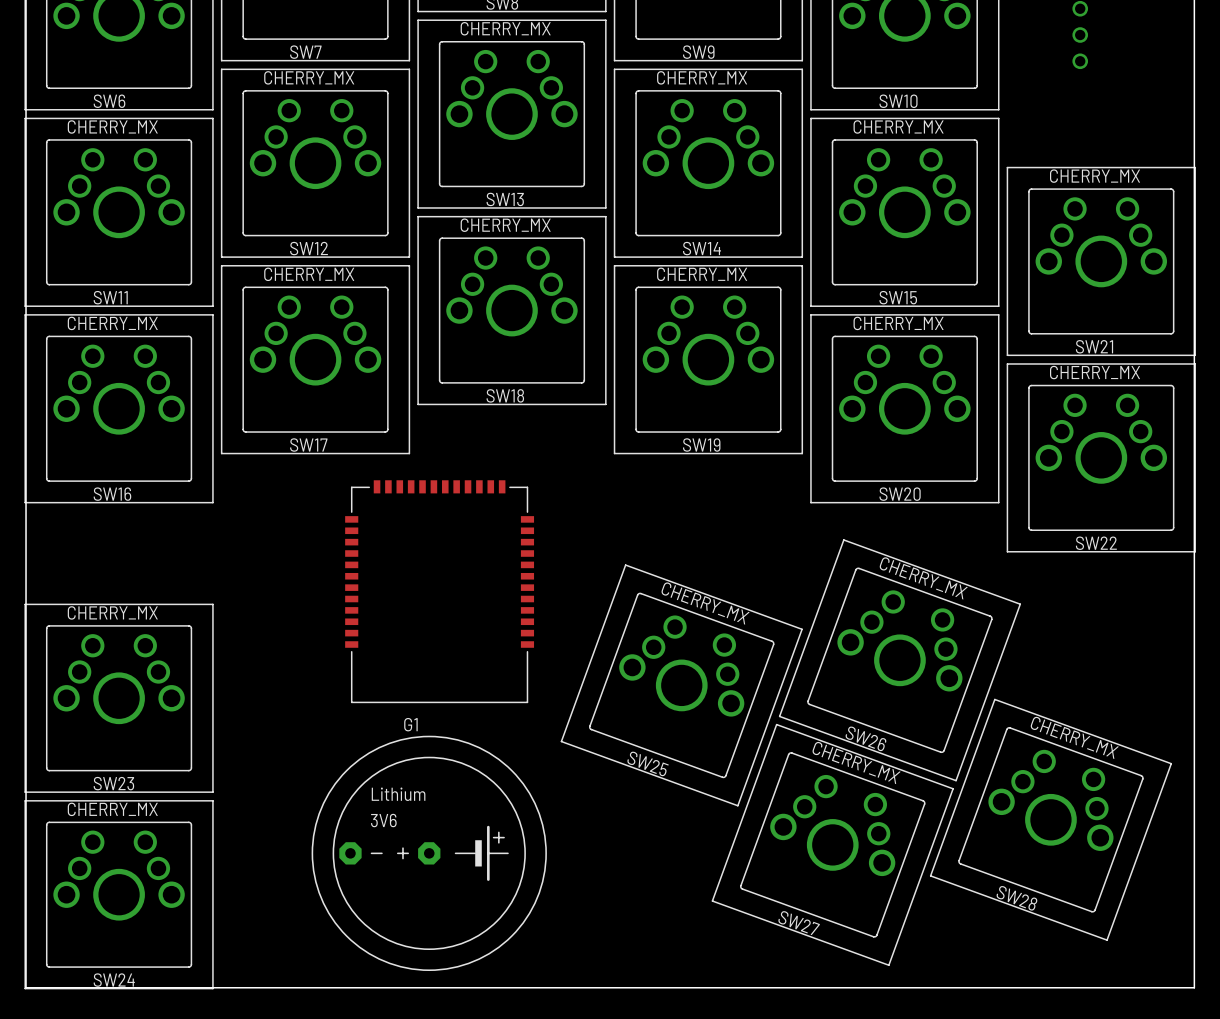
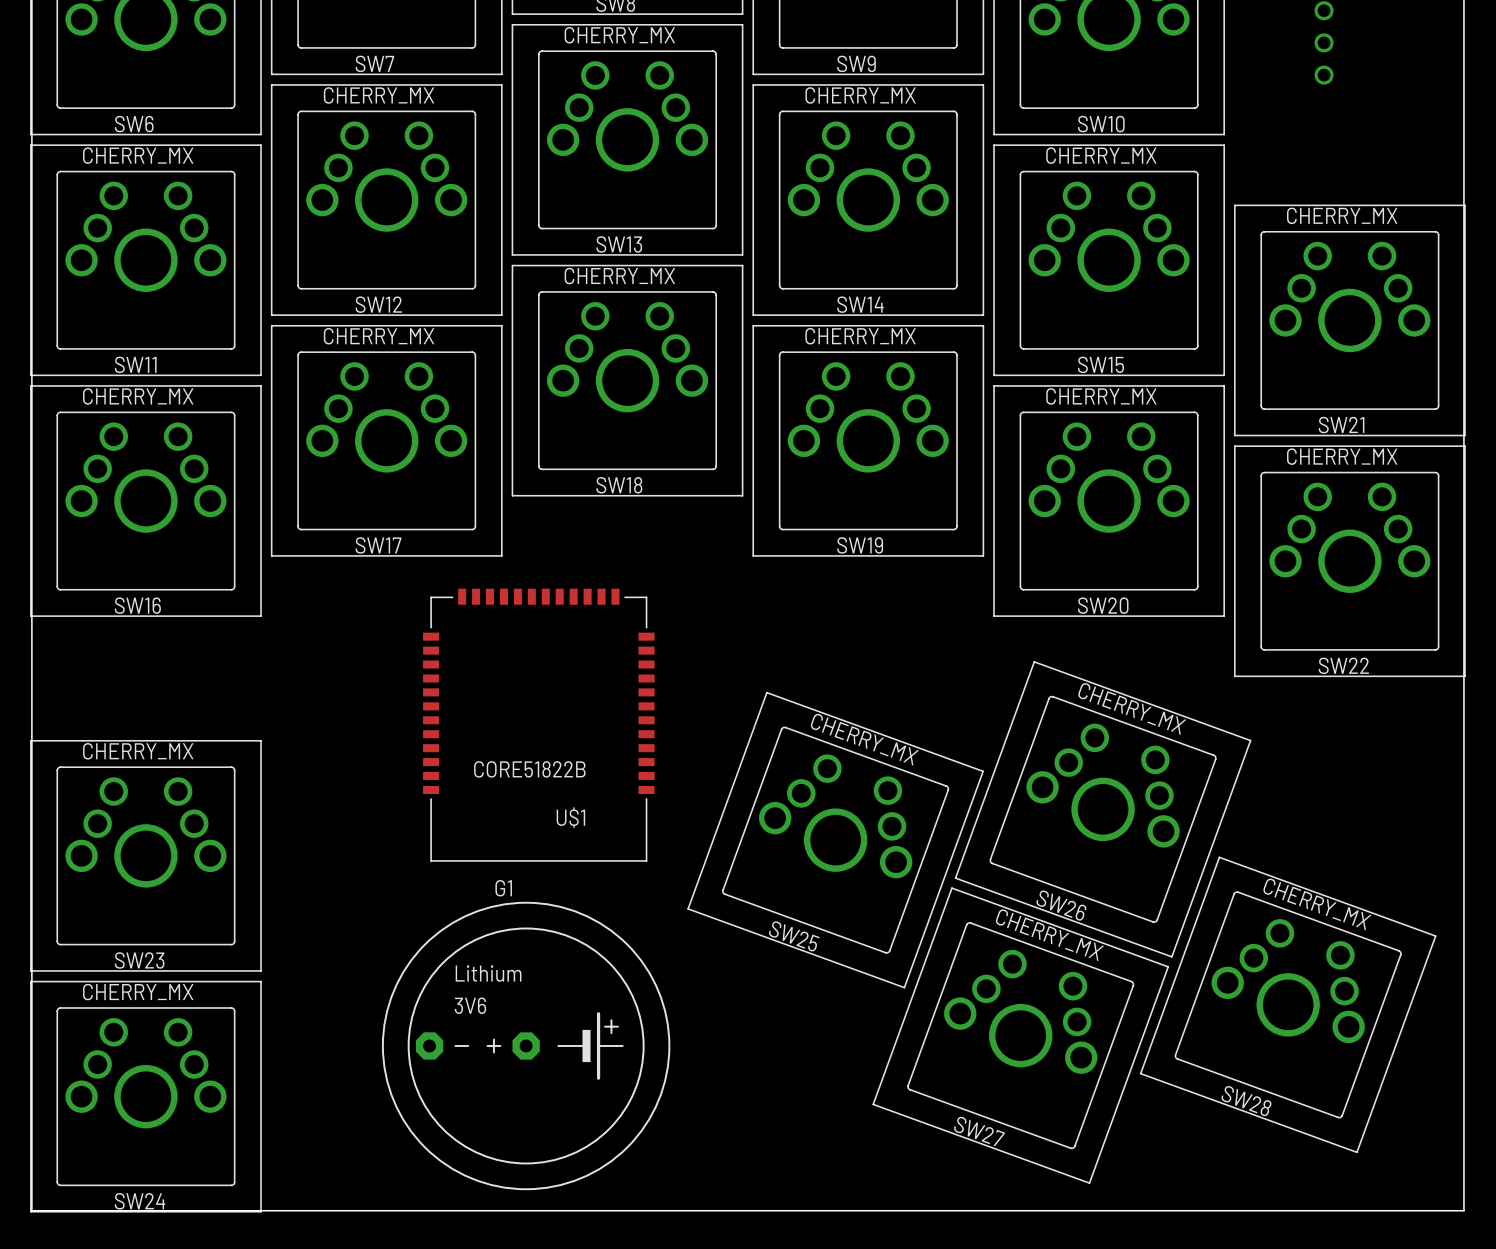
U$1 value: none -> CORE51822B (529, 769)
U$1 name: none -> U$1 (570, 817)

